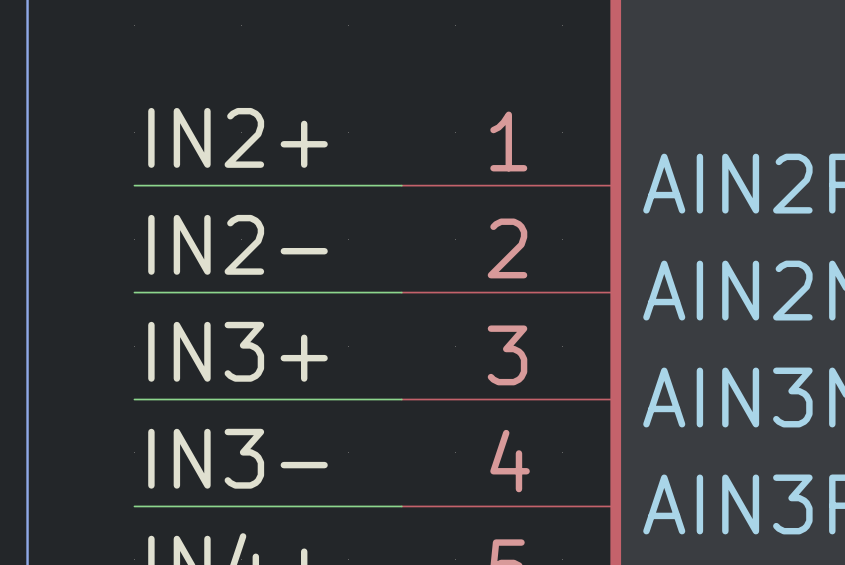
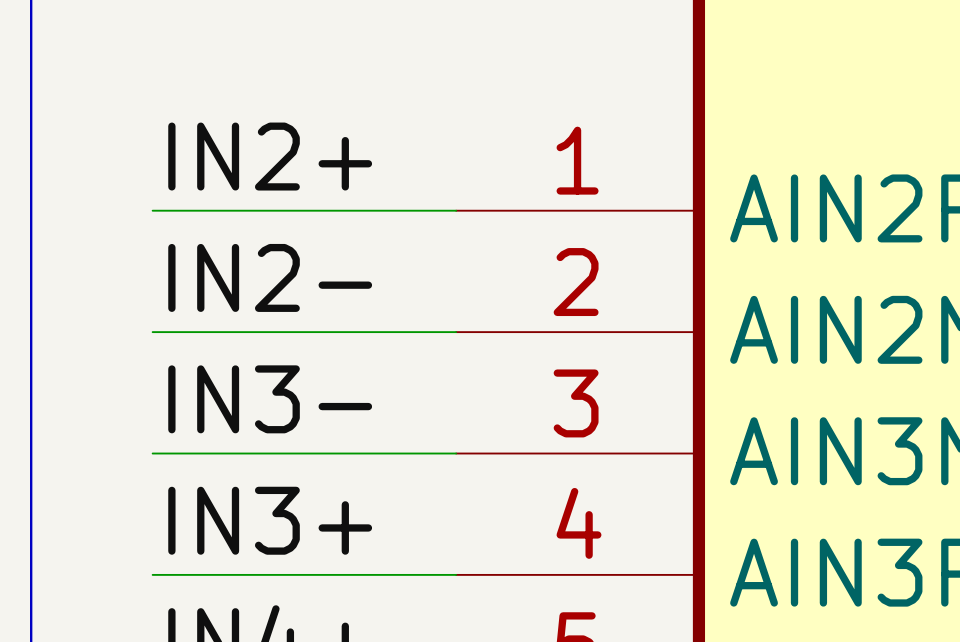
label: IN3+ (237, 351) -> IN3- (270, 399)
label: IN3- (237, 458) -> IN3+ (270, 520)

